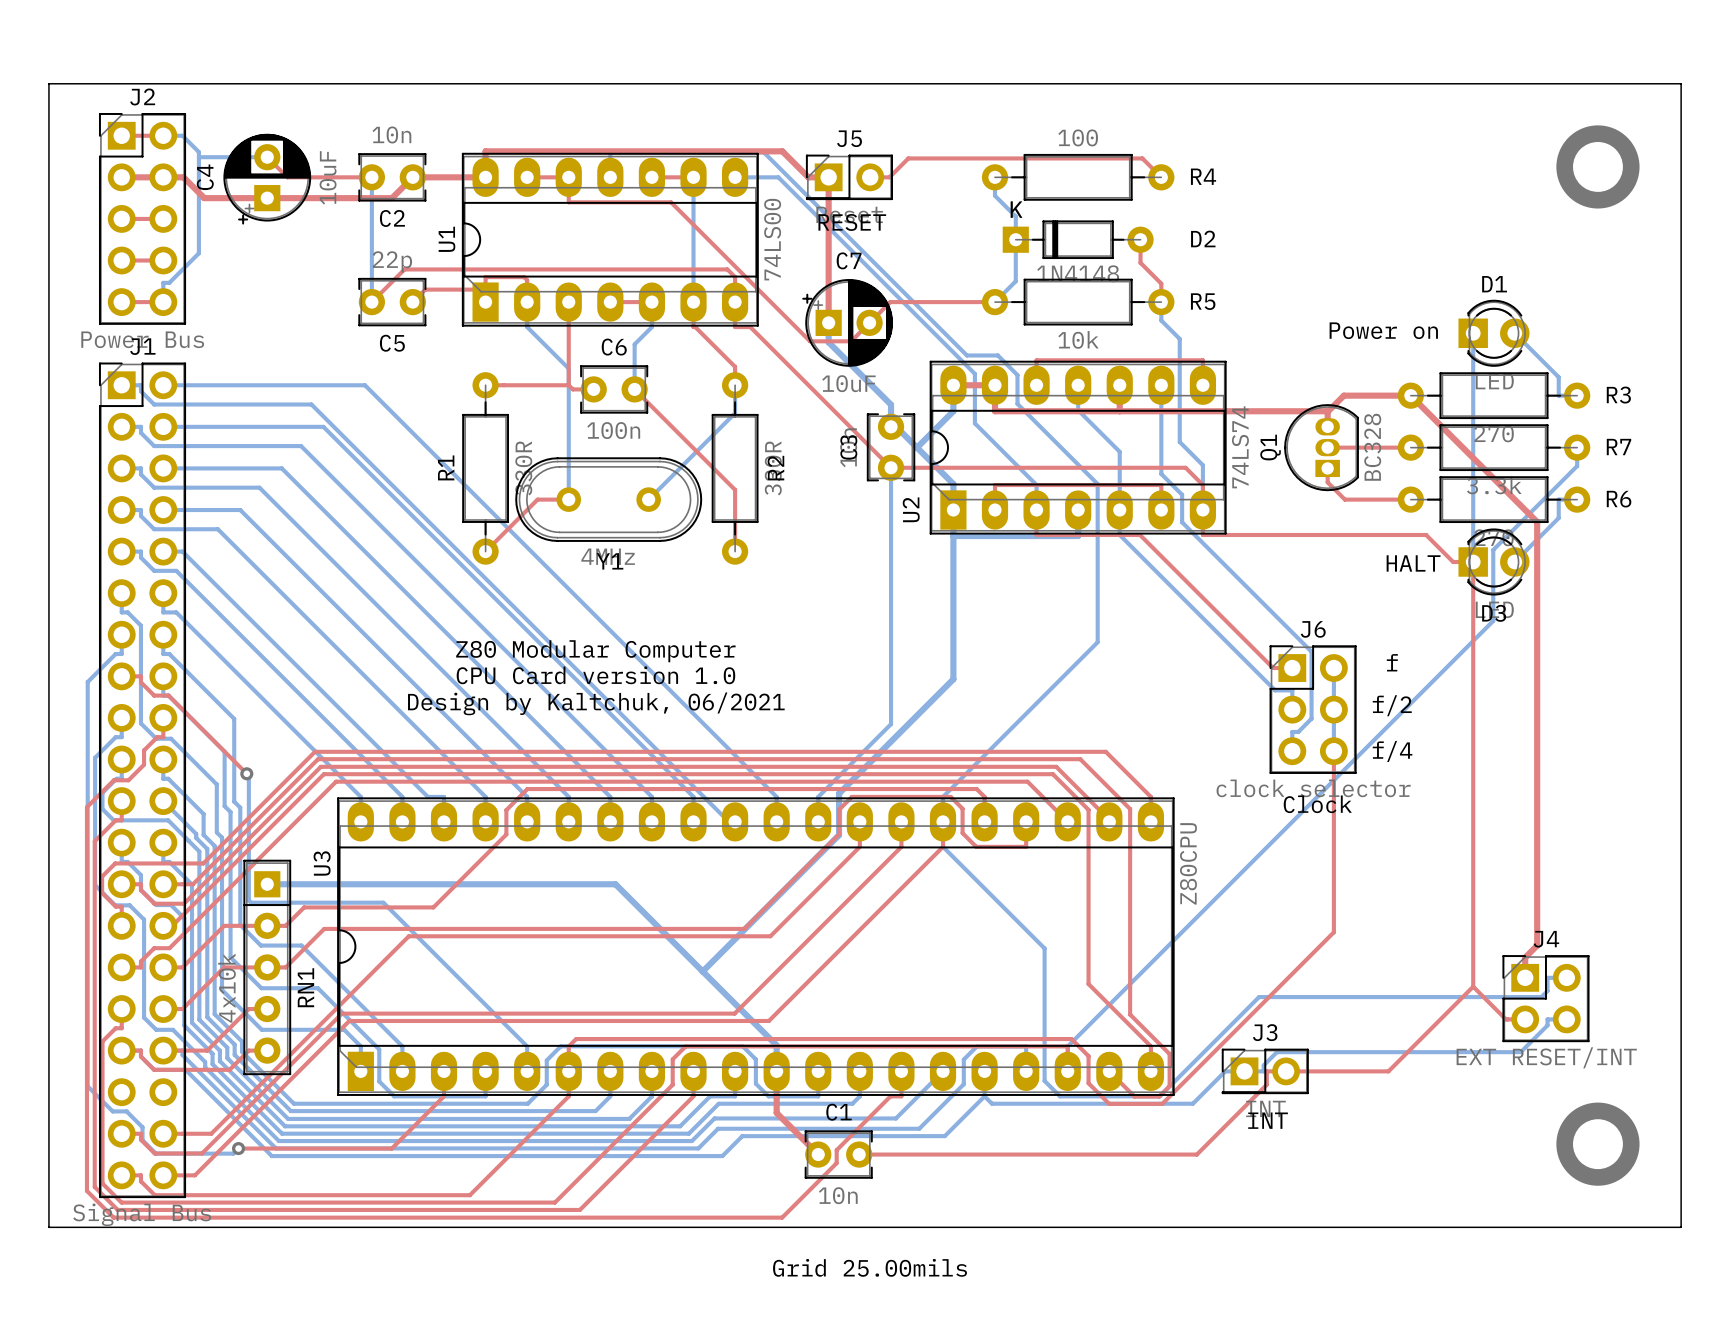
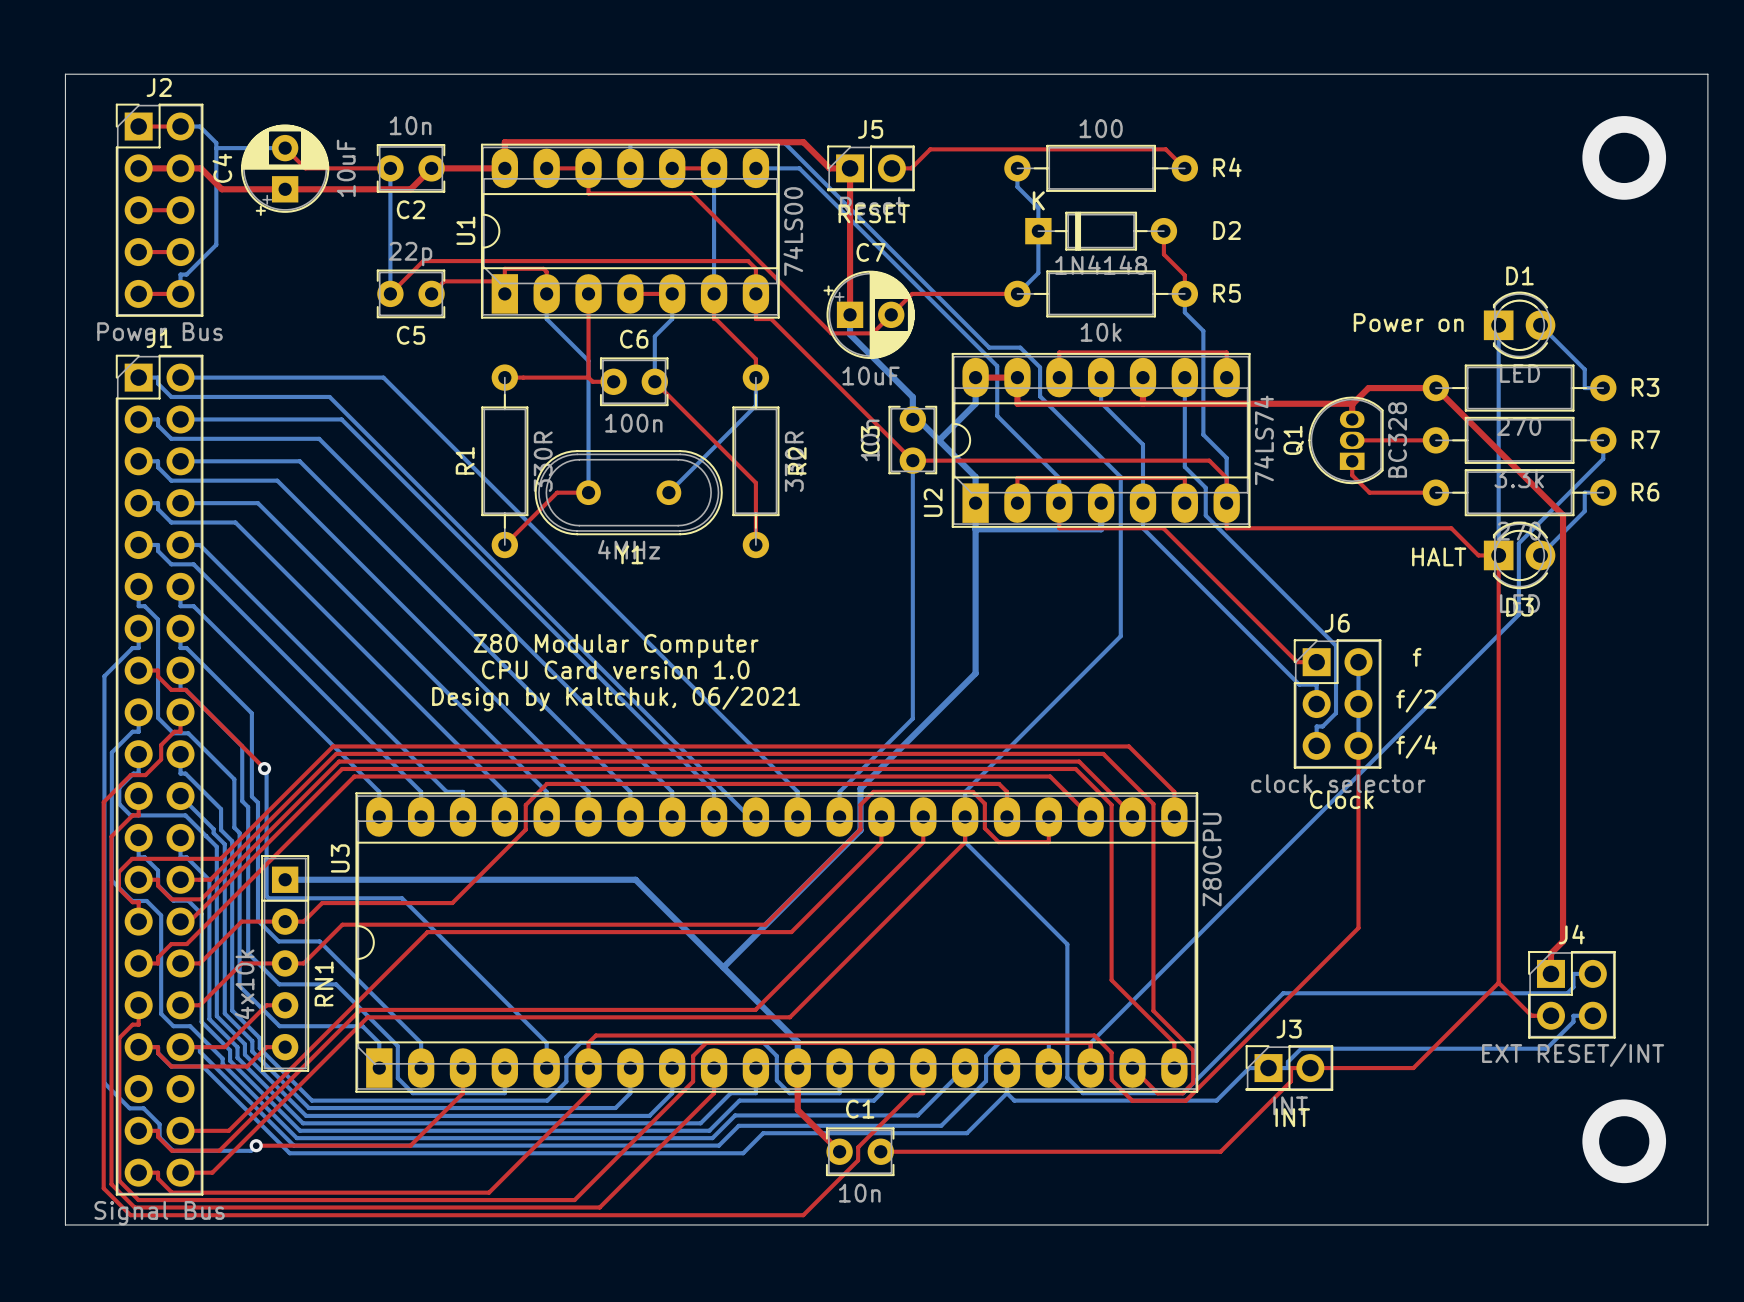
text: Grid 25.00mils (870, 1267) -> none

